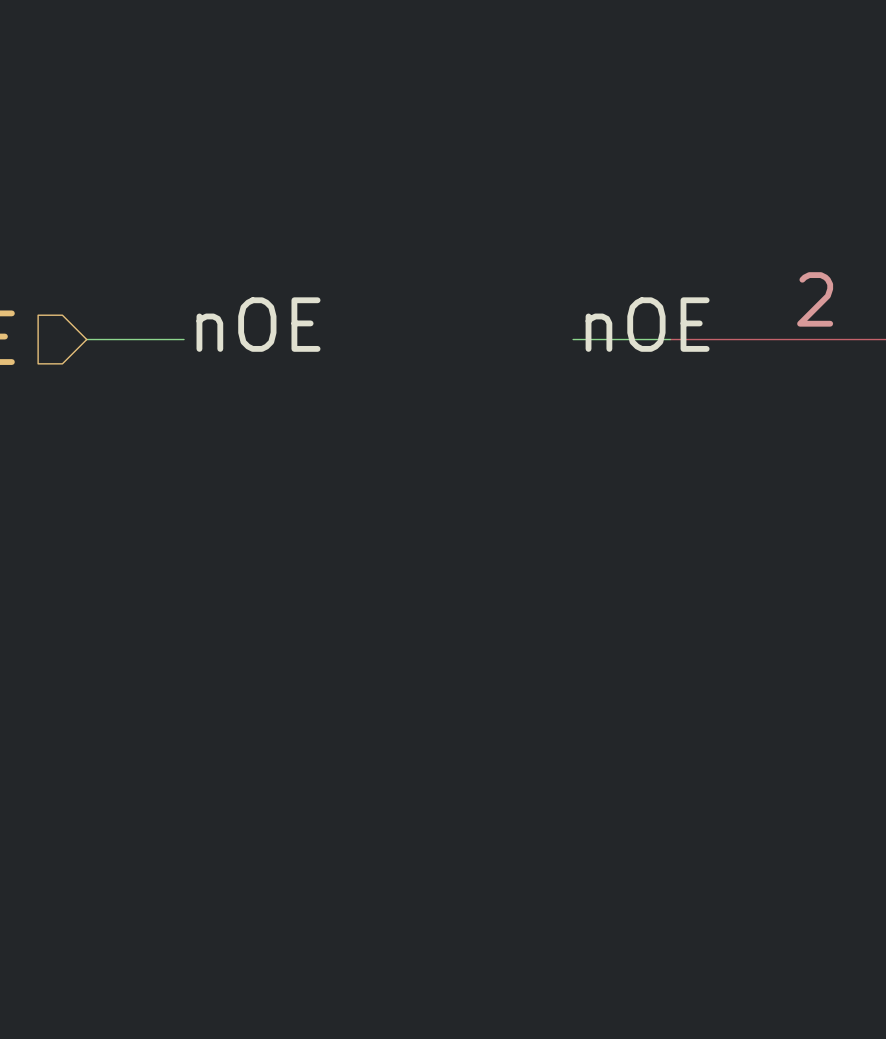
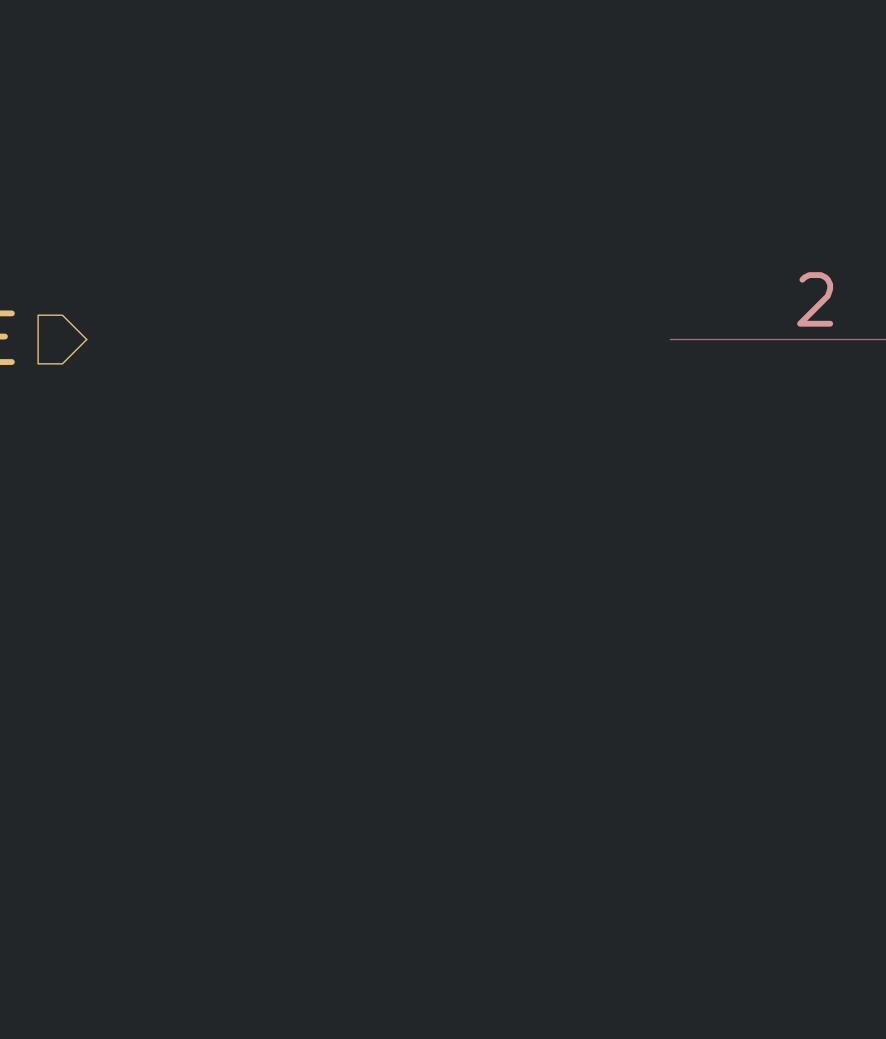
label: nOE (258, 324) -> none
label: nOE (647, 324) -> none
wire: (86, 339) (184, 339) -> none
wire: (573, 339) (670, 339) -> none

